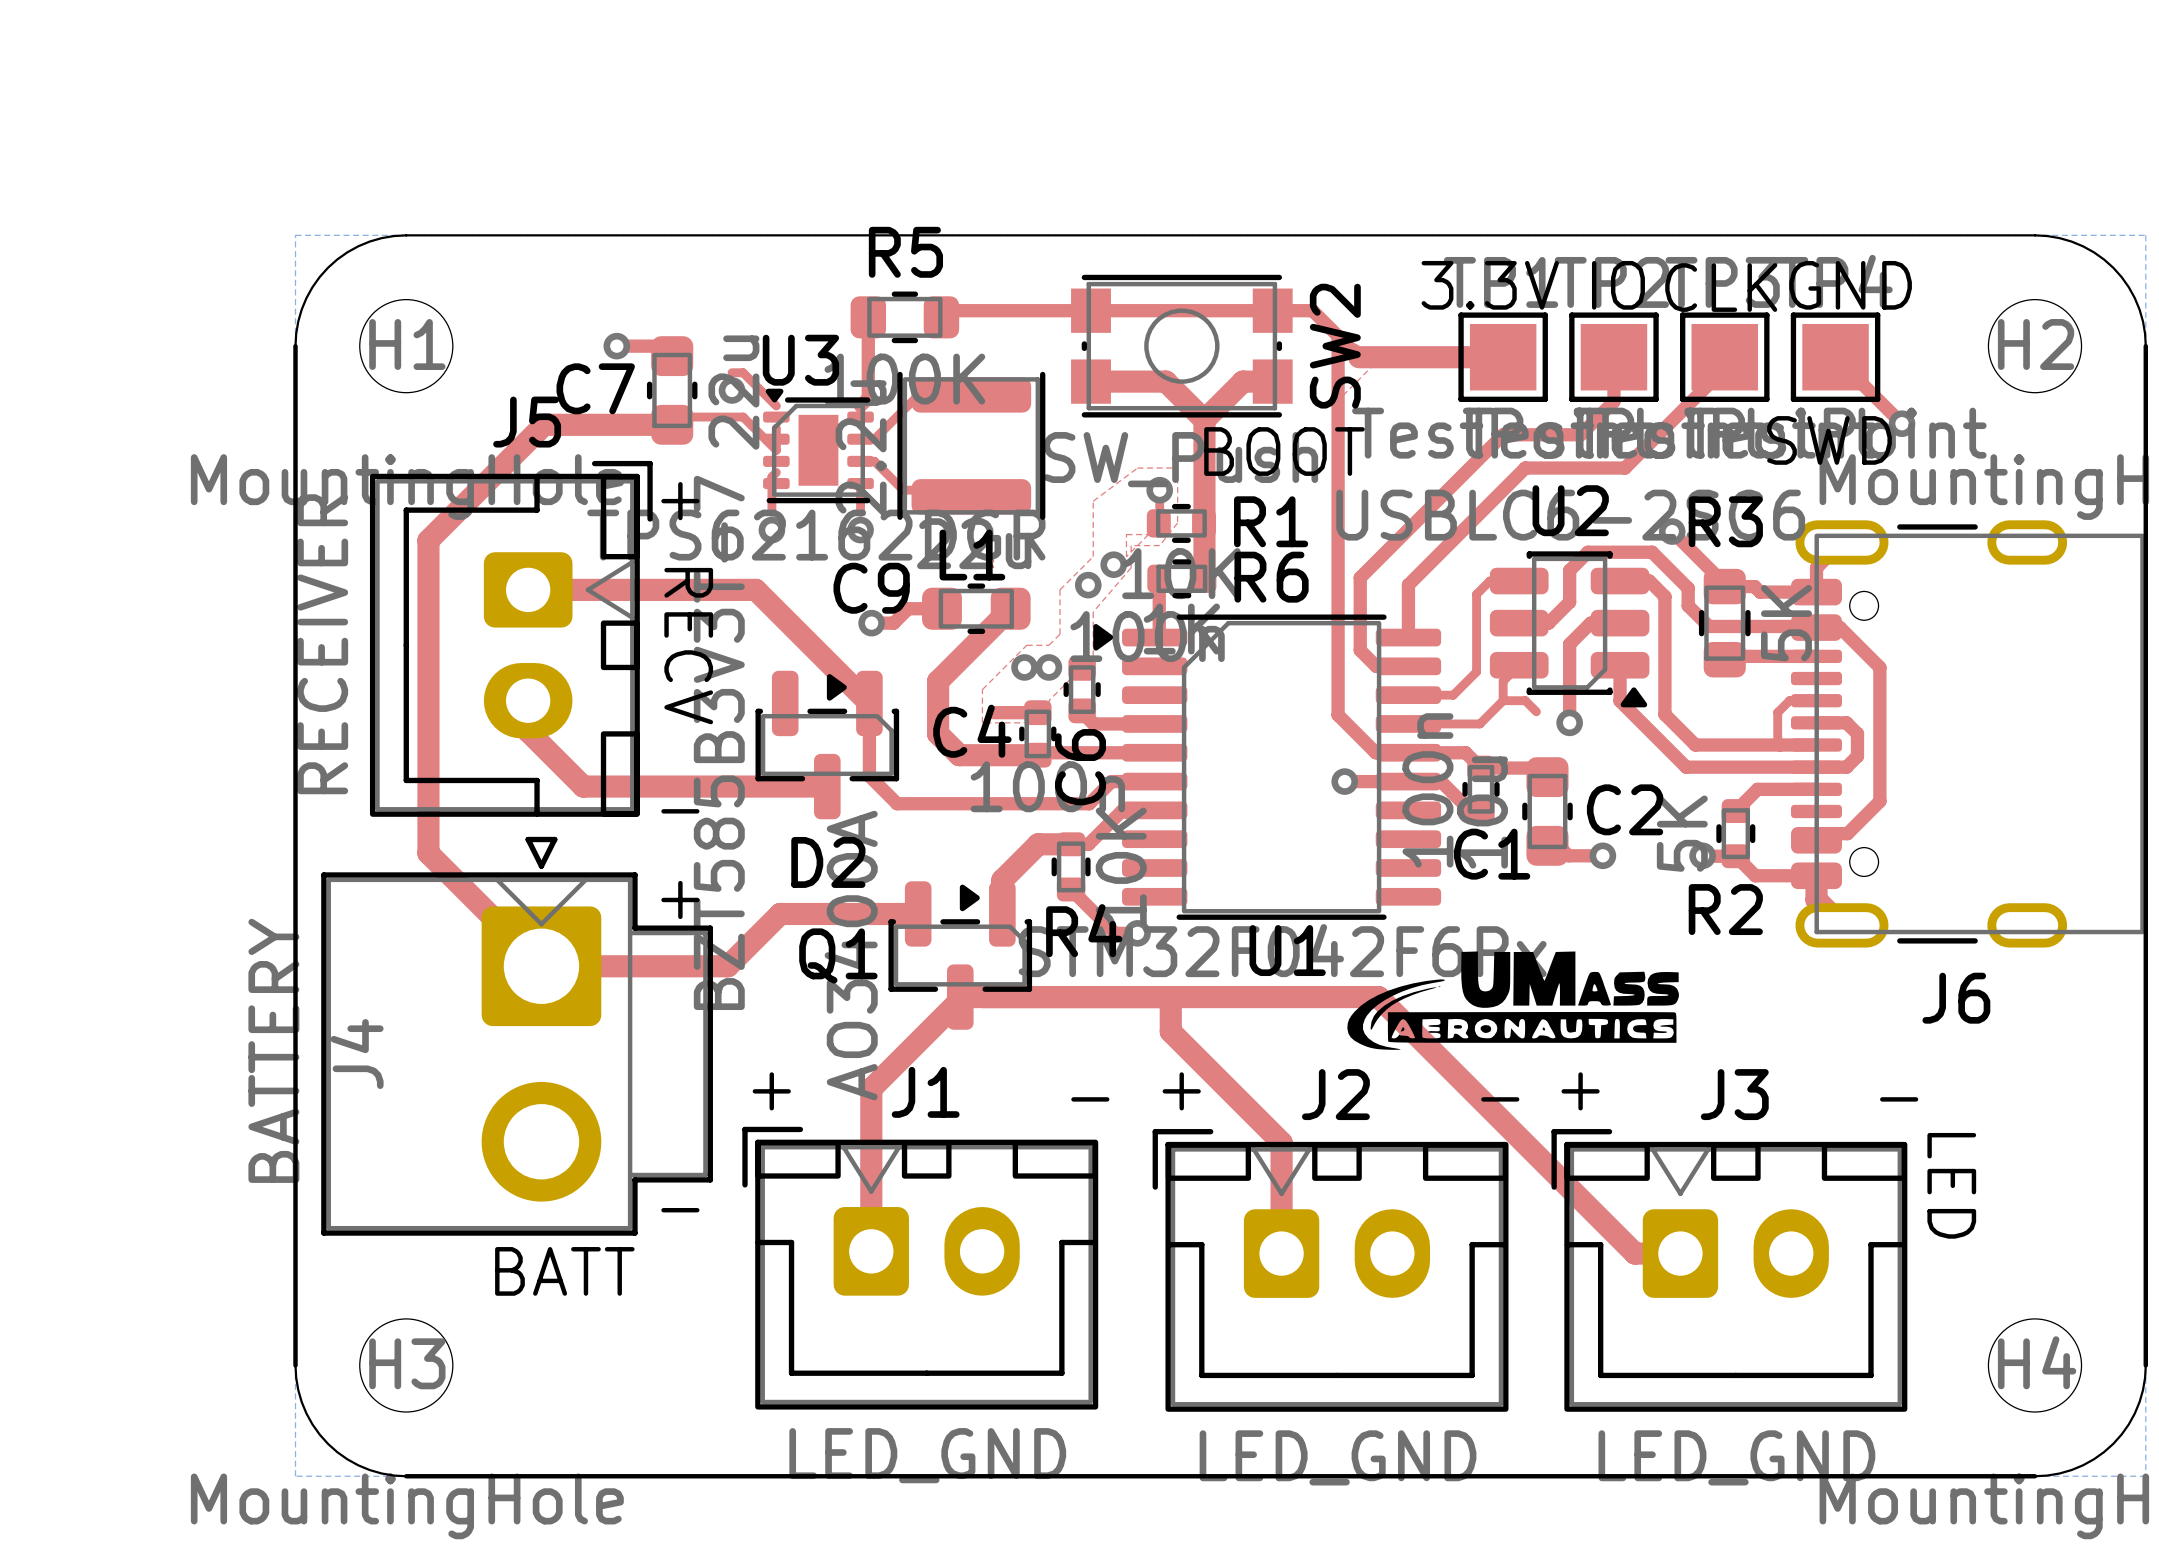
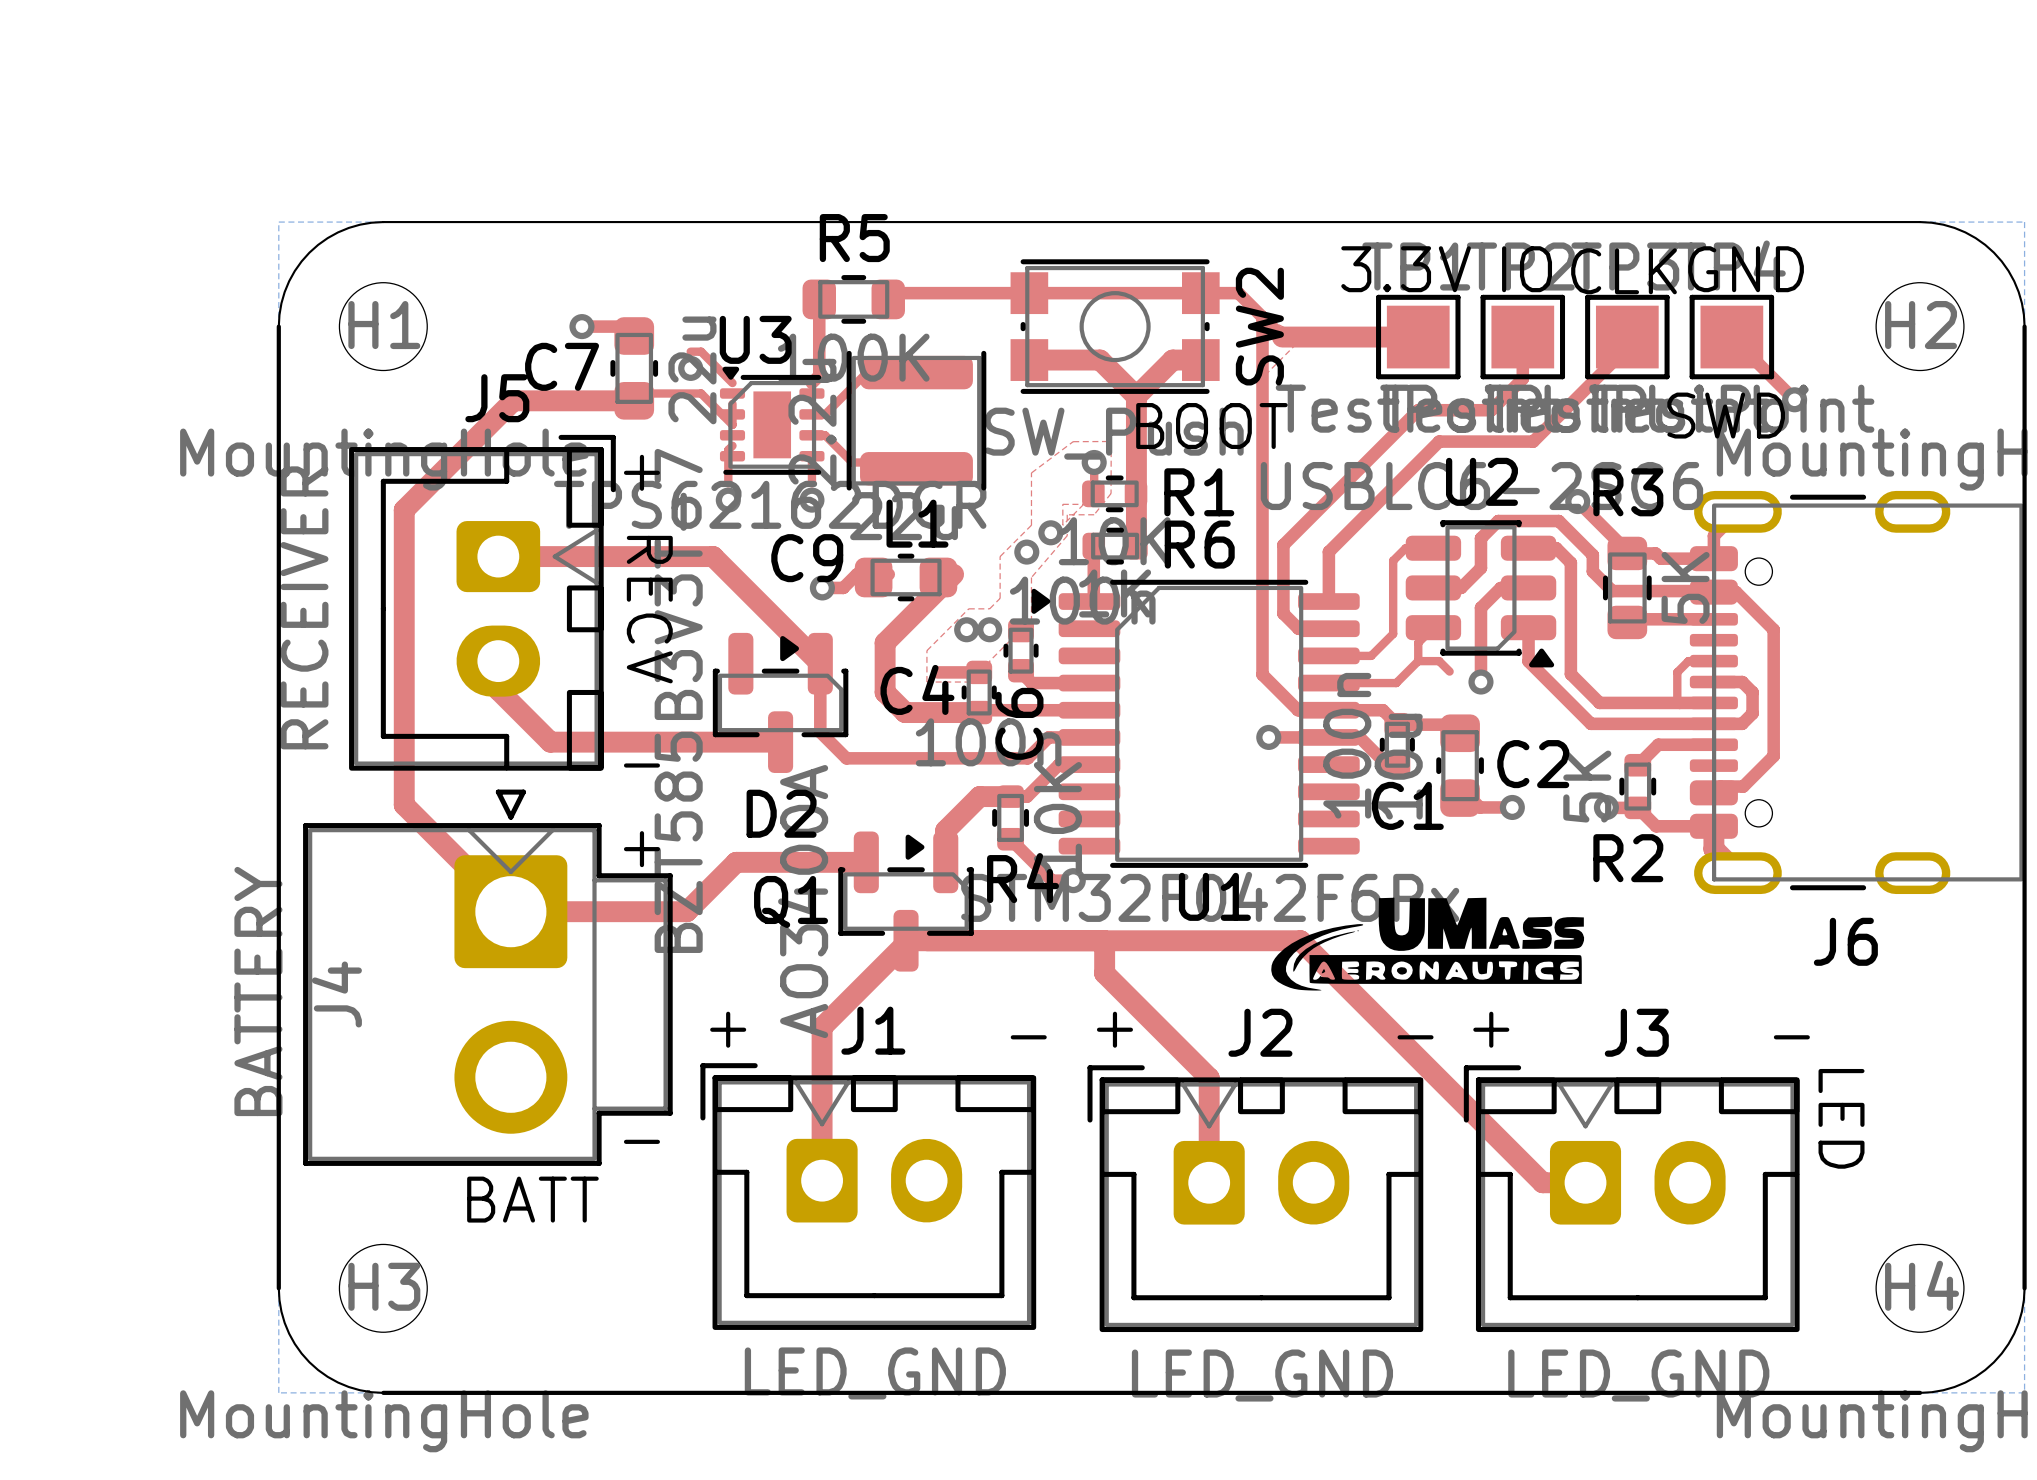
C9 position: (976, 608) -> (906, 577)

